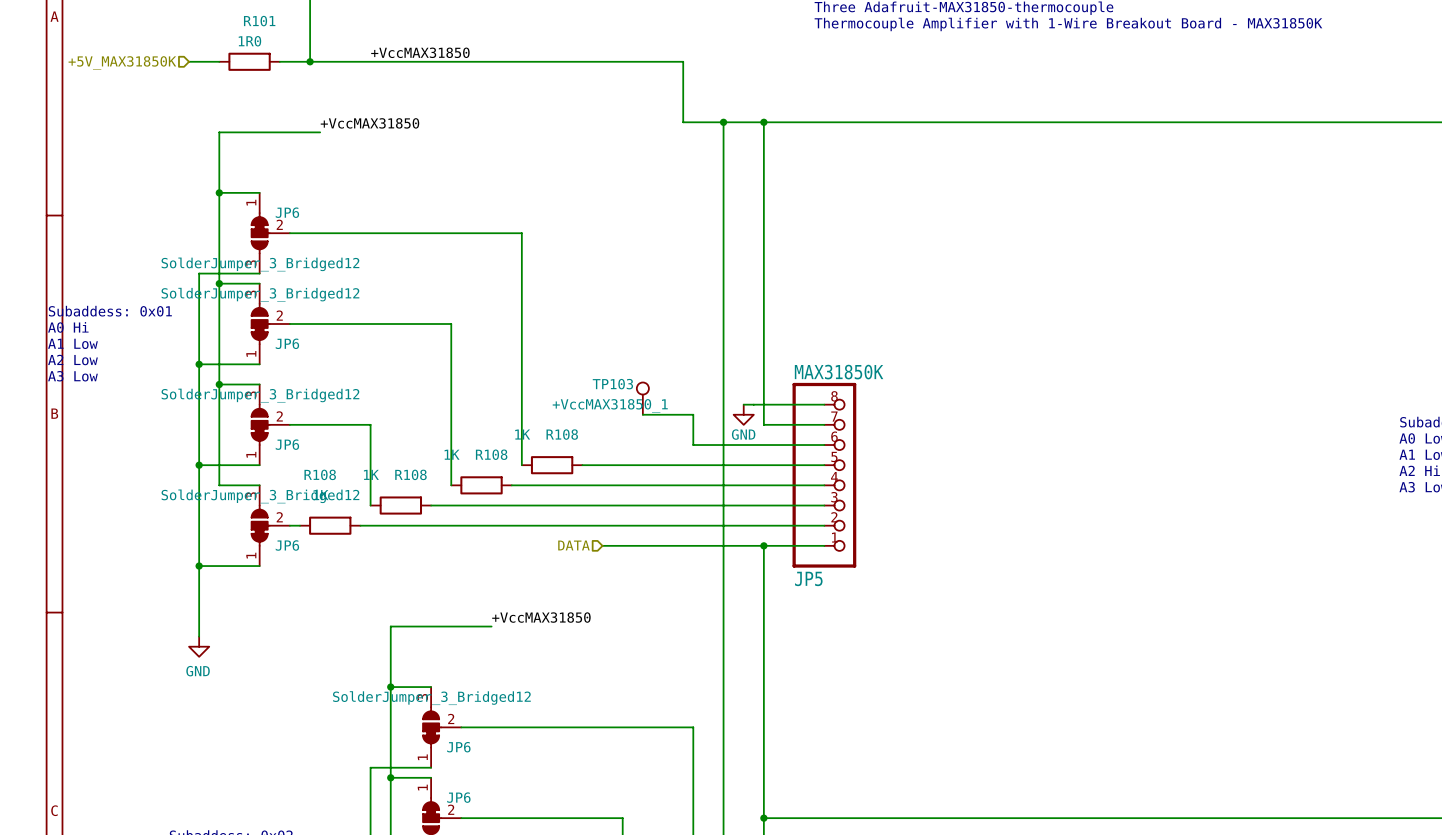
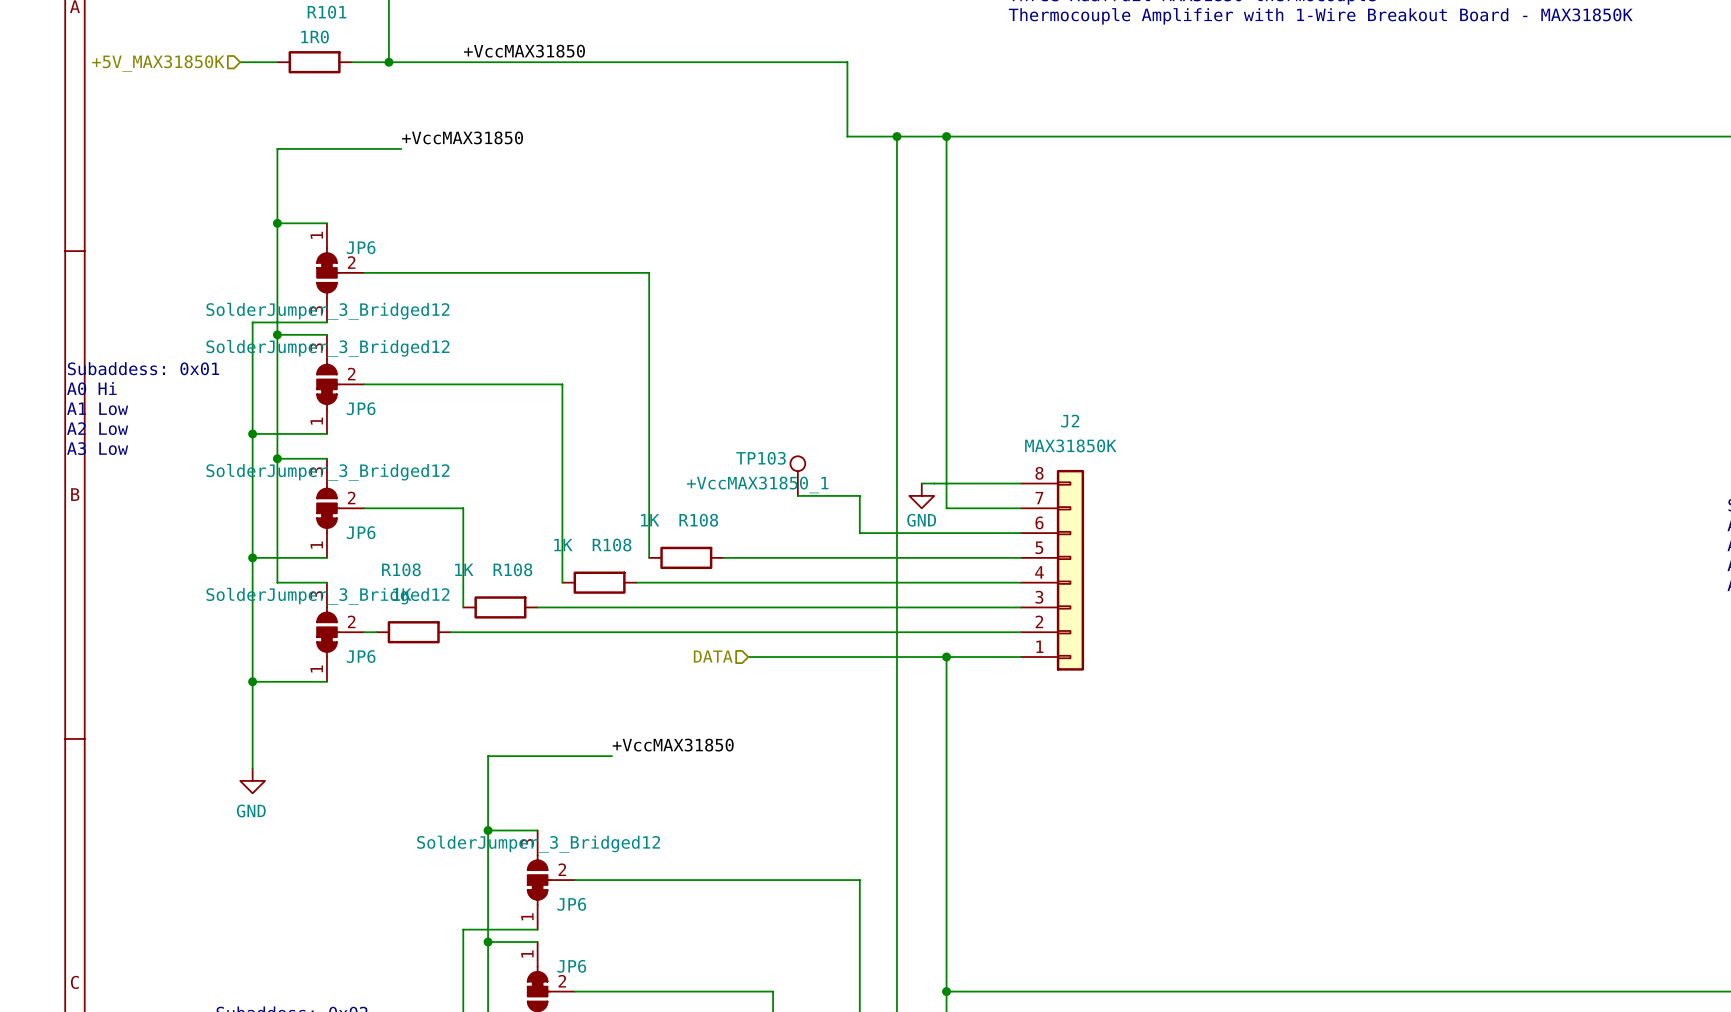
JP5: MAX31850K (824, 475) -> none
J2: none -> MAX31850K (1052, 570)

